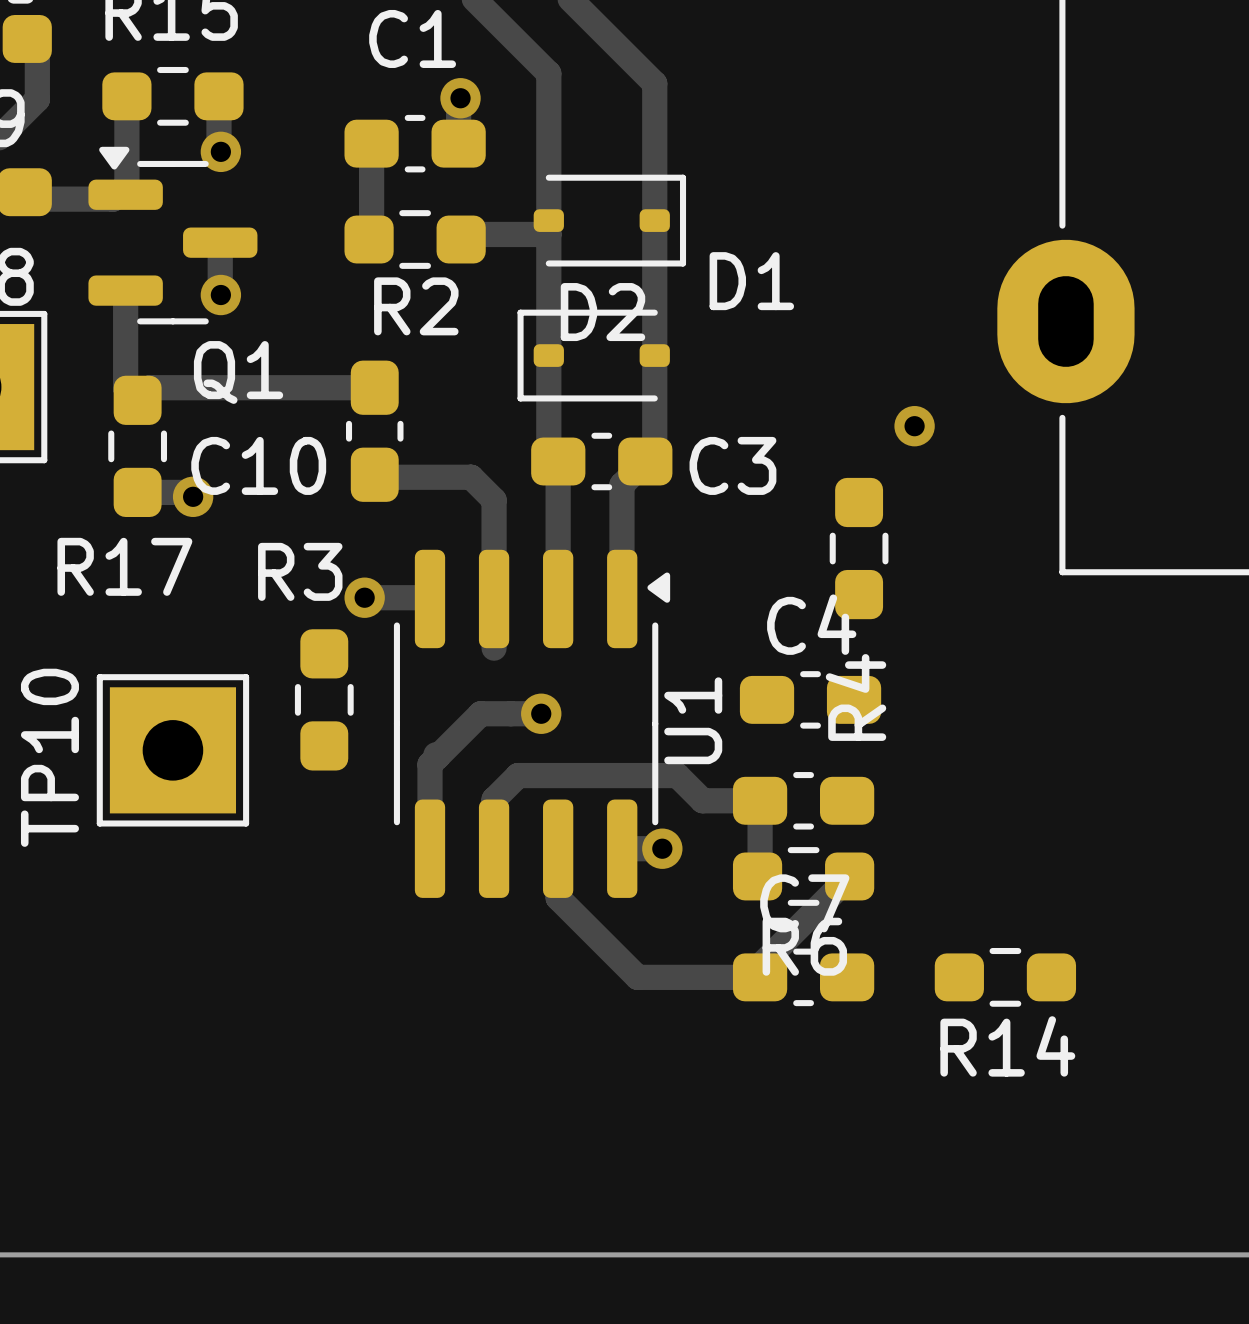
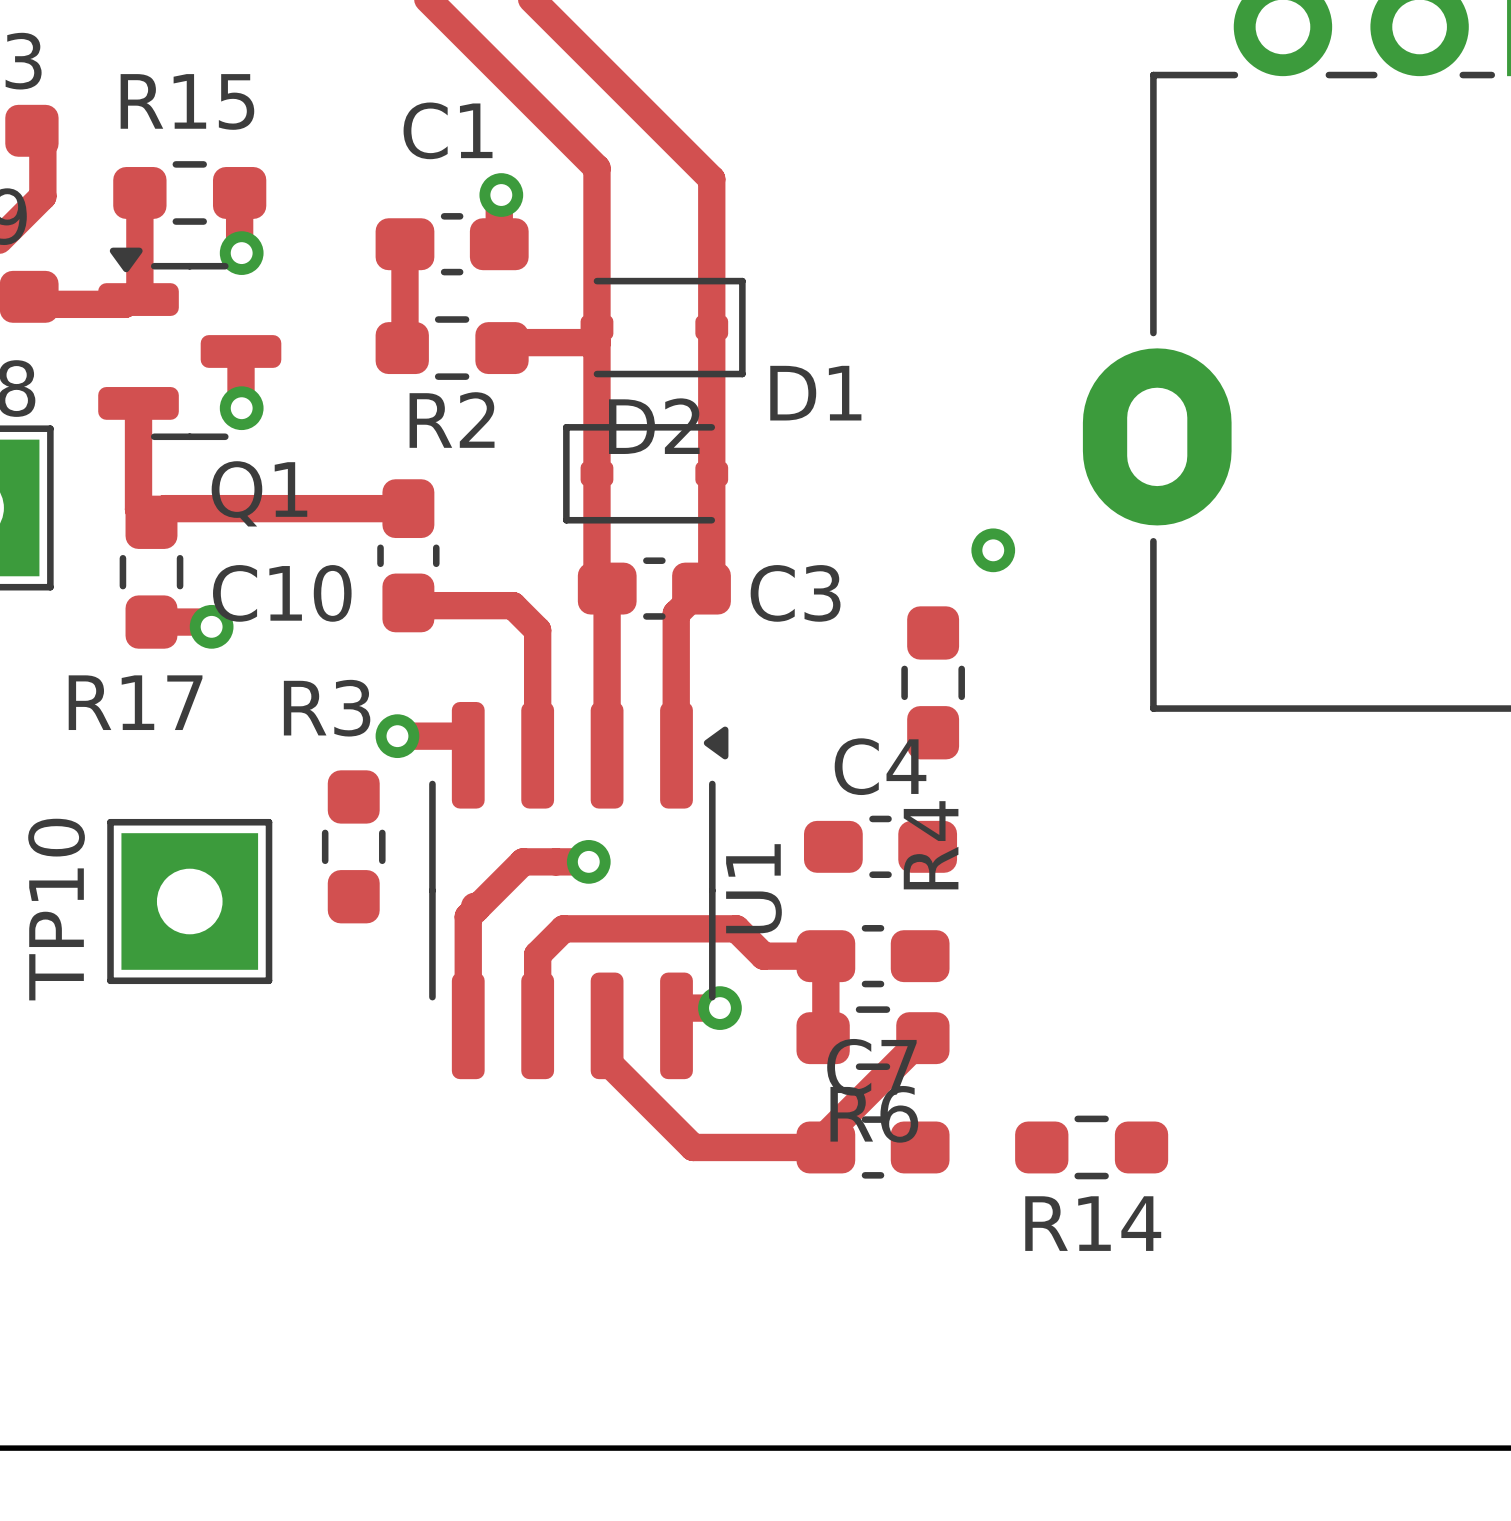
U1 position: (532, 723) -> (578, 890)

